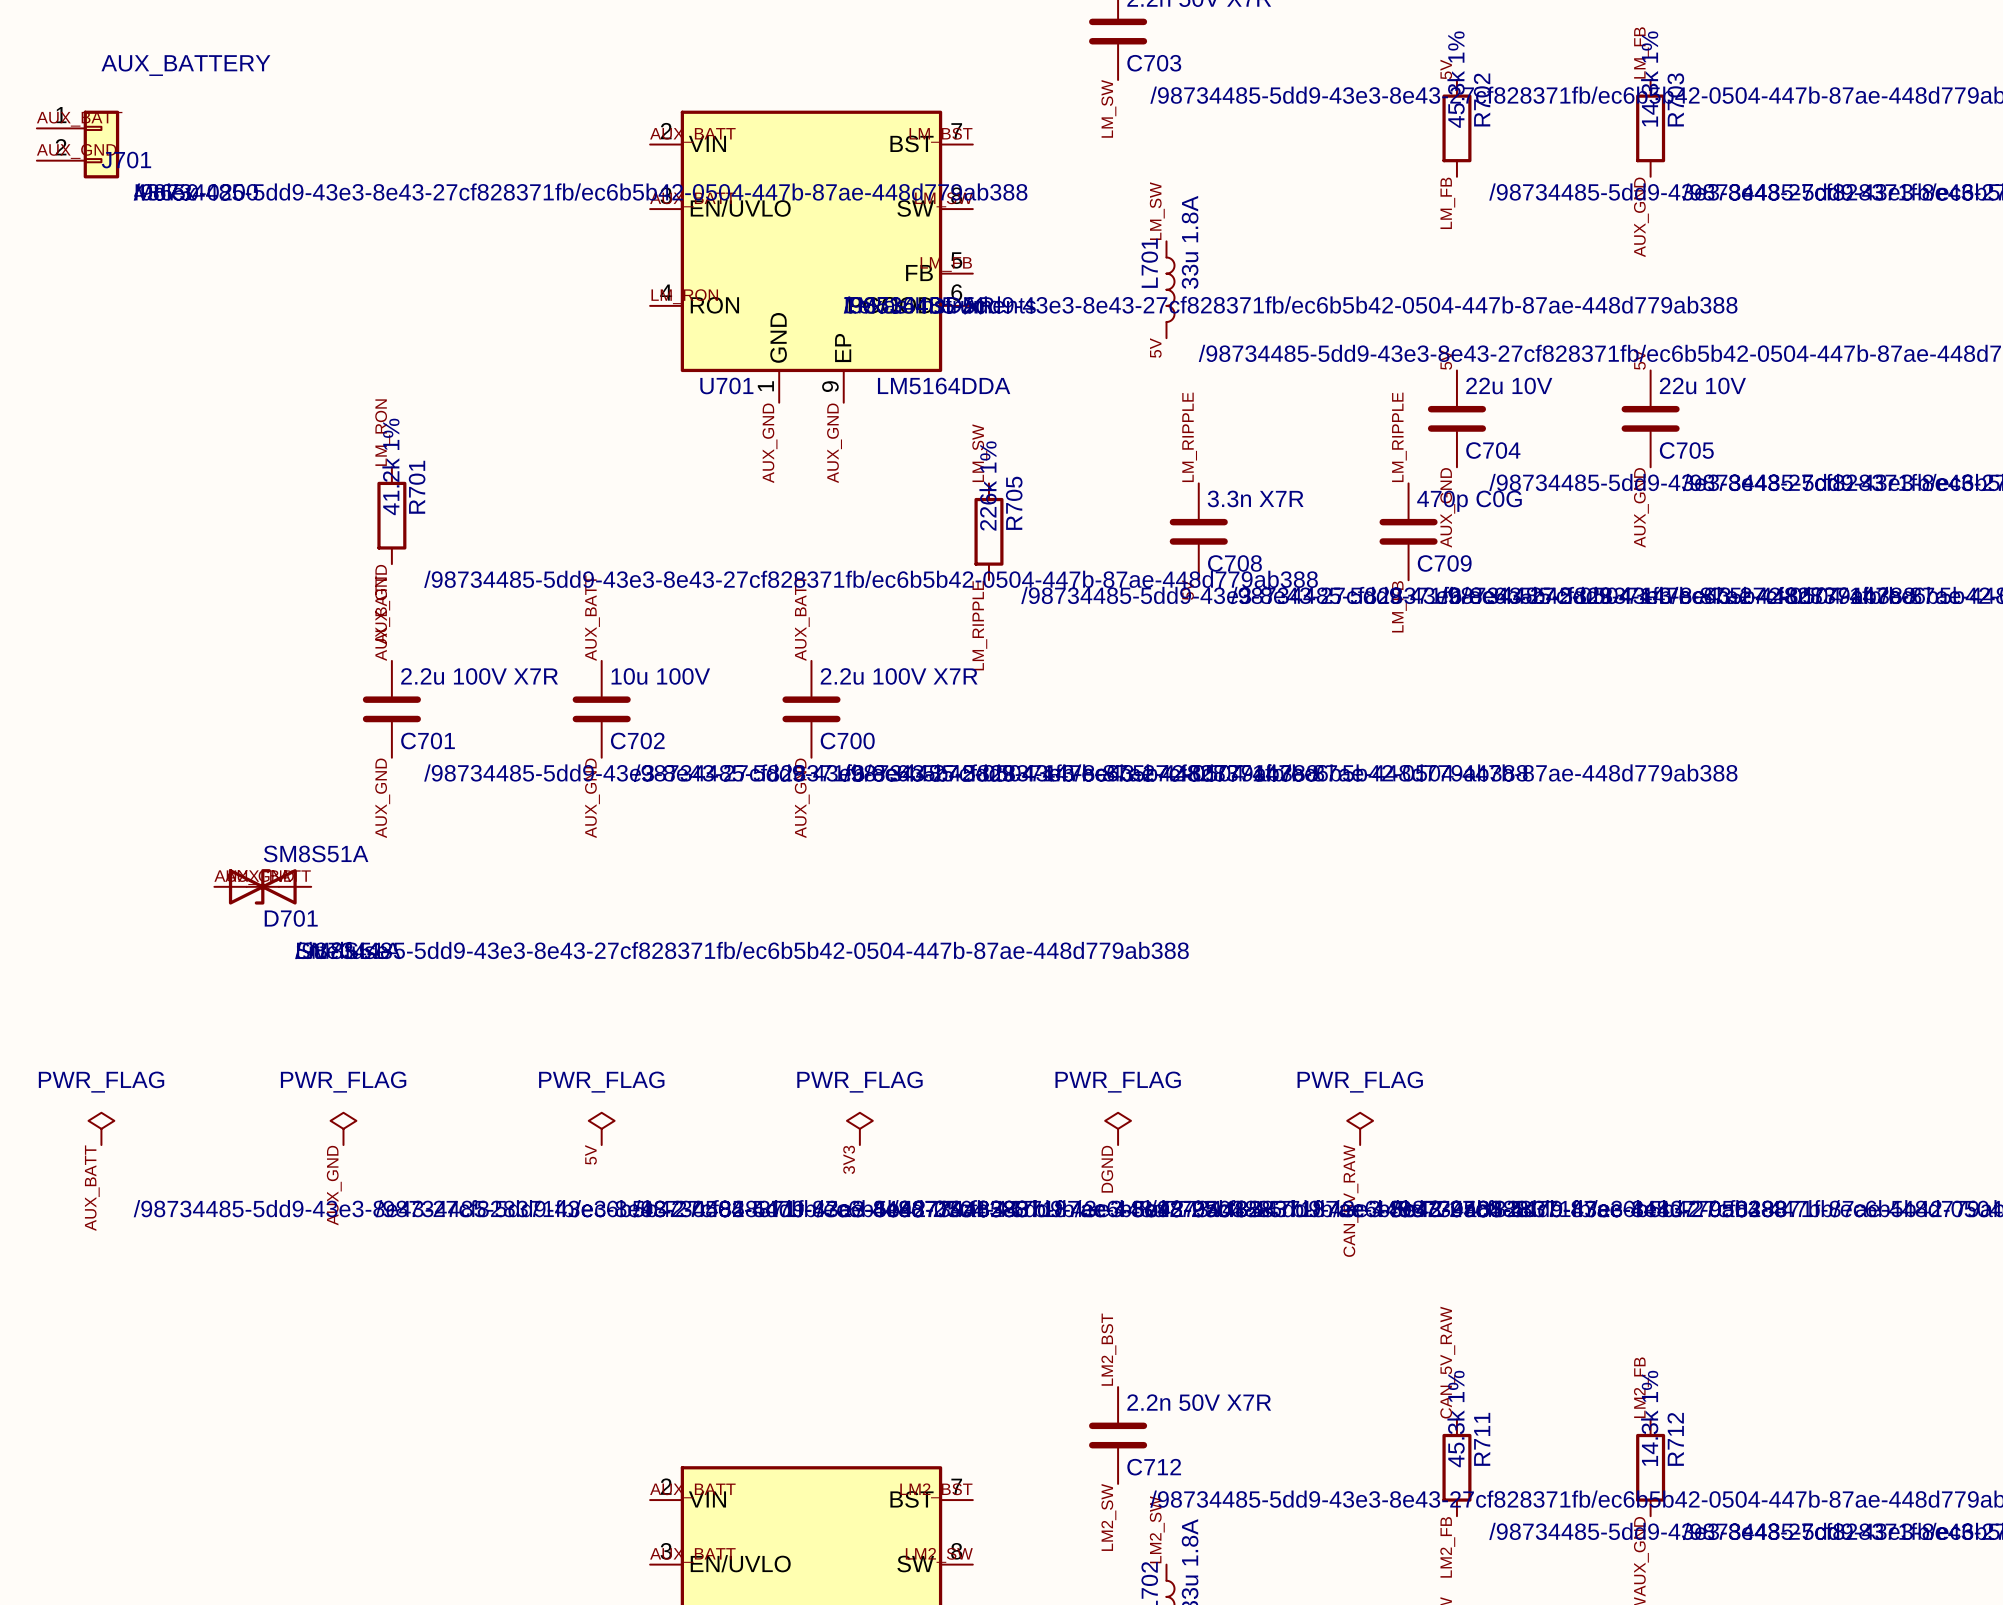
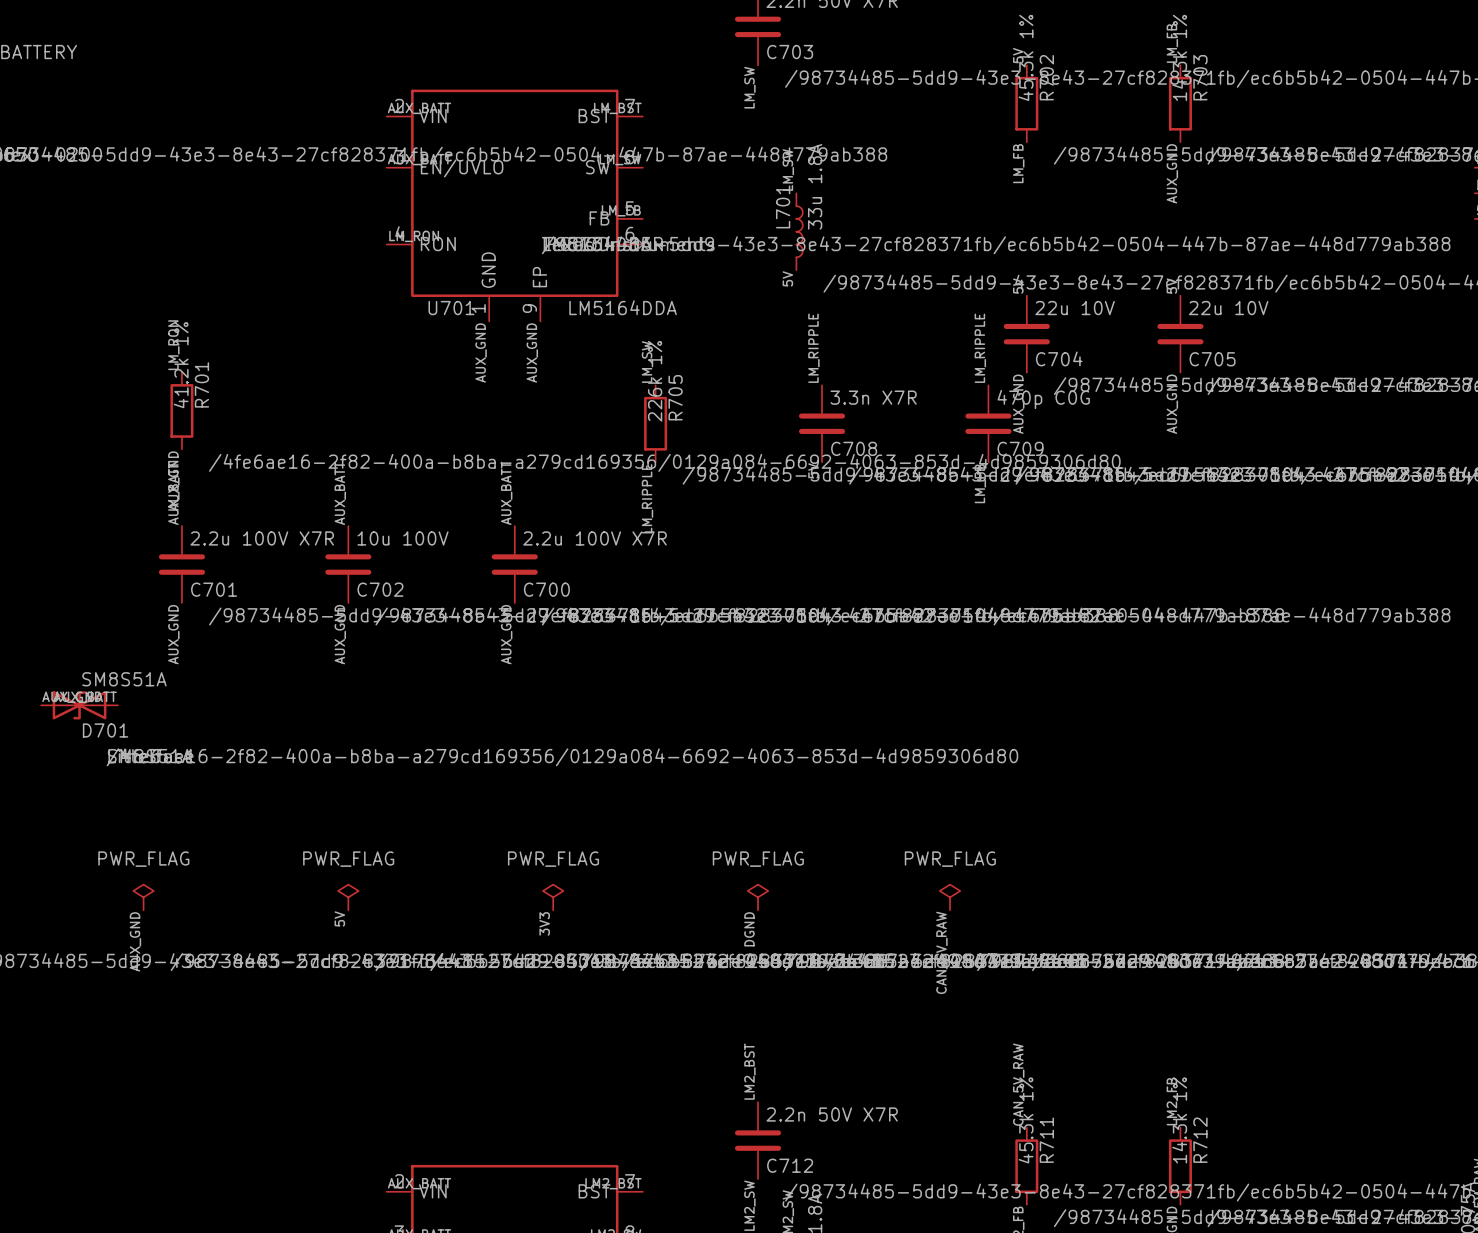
R701 text: /98734485-5dd9-43e3-8e43-27cf828371fb/ec6b5b42-0504-447b-87ae-448d779ab388 (871, 579) -> /4fe6ae16-2f82-400a-b8ba-a279cd169356/0129a084-6692-4063-853d-4d9859306d80 (664, 462)
D701 text: /98734485-5dd9-43e3-8e43-27cf828371fb/ec6b5b42-0504-447b-87ae-448d779ab388 (741, 950) -> /4fe6ae16-2f82-400a-b8ba-a279cd169356/0129a084-6692-4063-853d-4d9859306d80 (562, 757)

